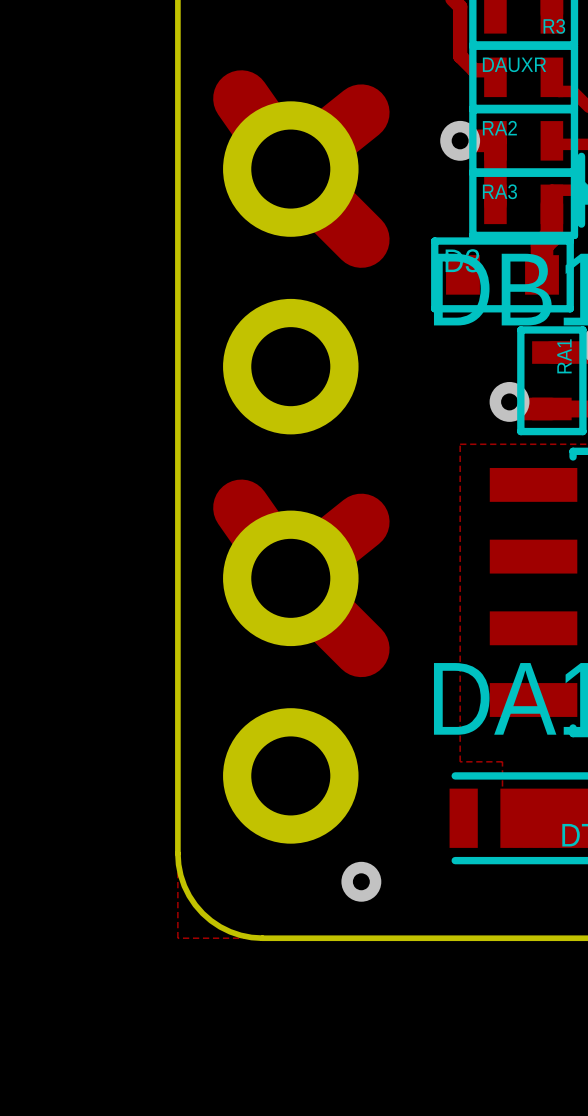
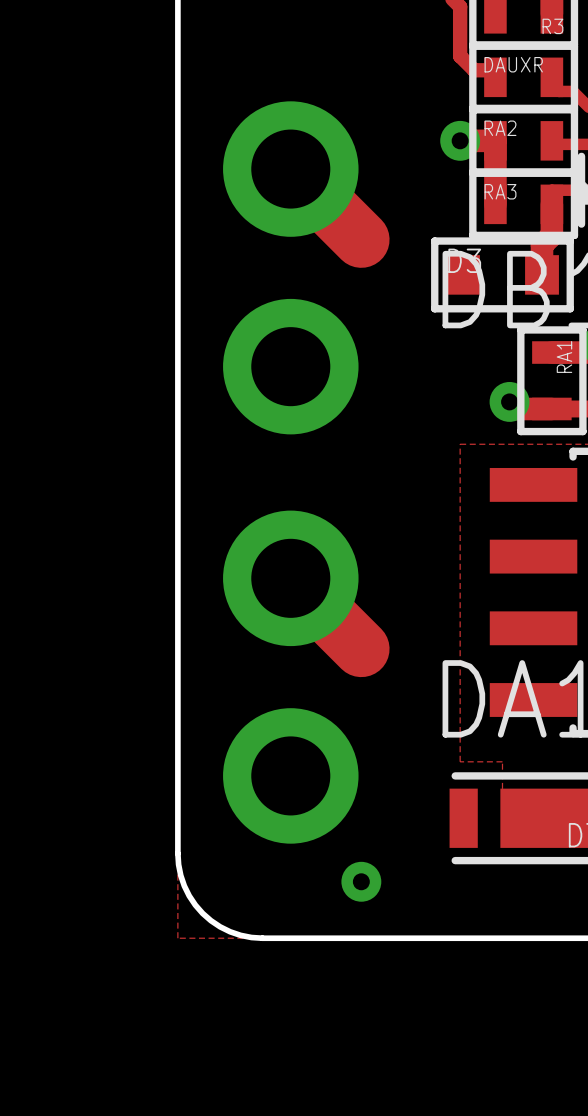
track: (241, 98) (290, 169) (361, 112) -> none
track: (241, 507) (290, 578) (361, 521) -> none

